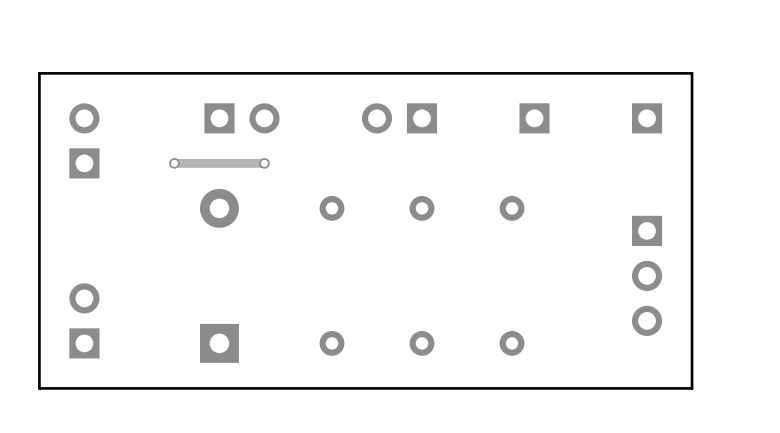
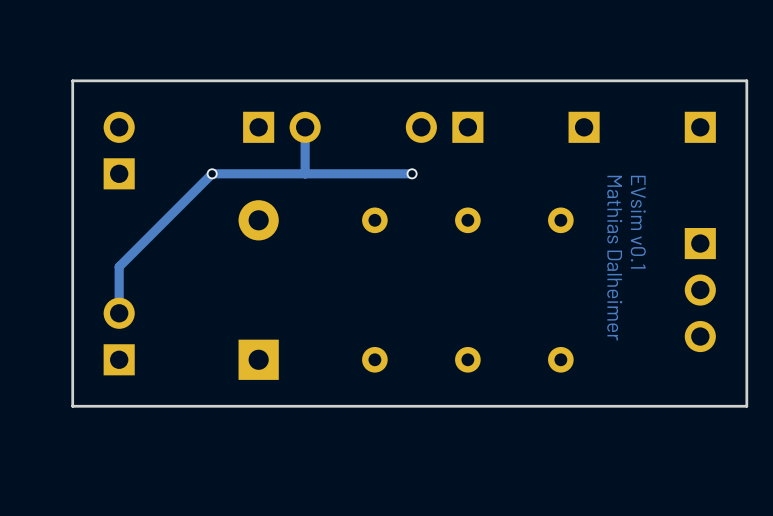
track: none -> (305, 127) (305, 173) (412, 173)
track: none -> (212, 173) (119, 266) (119, 313)
via position: (264, 163) -> (412, 173)
text: none -> EVsim v0.1 (638, 222)
text: none -> Mathias Dalheimer (614, 258)

